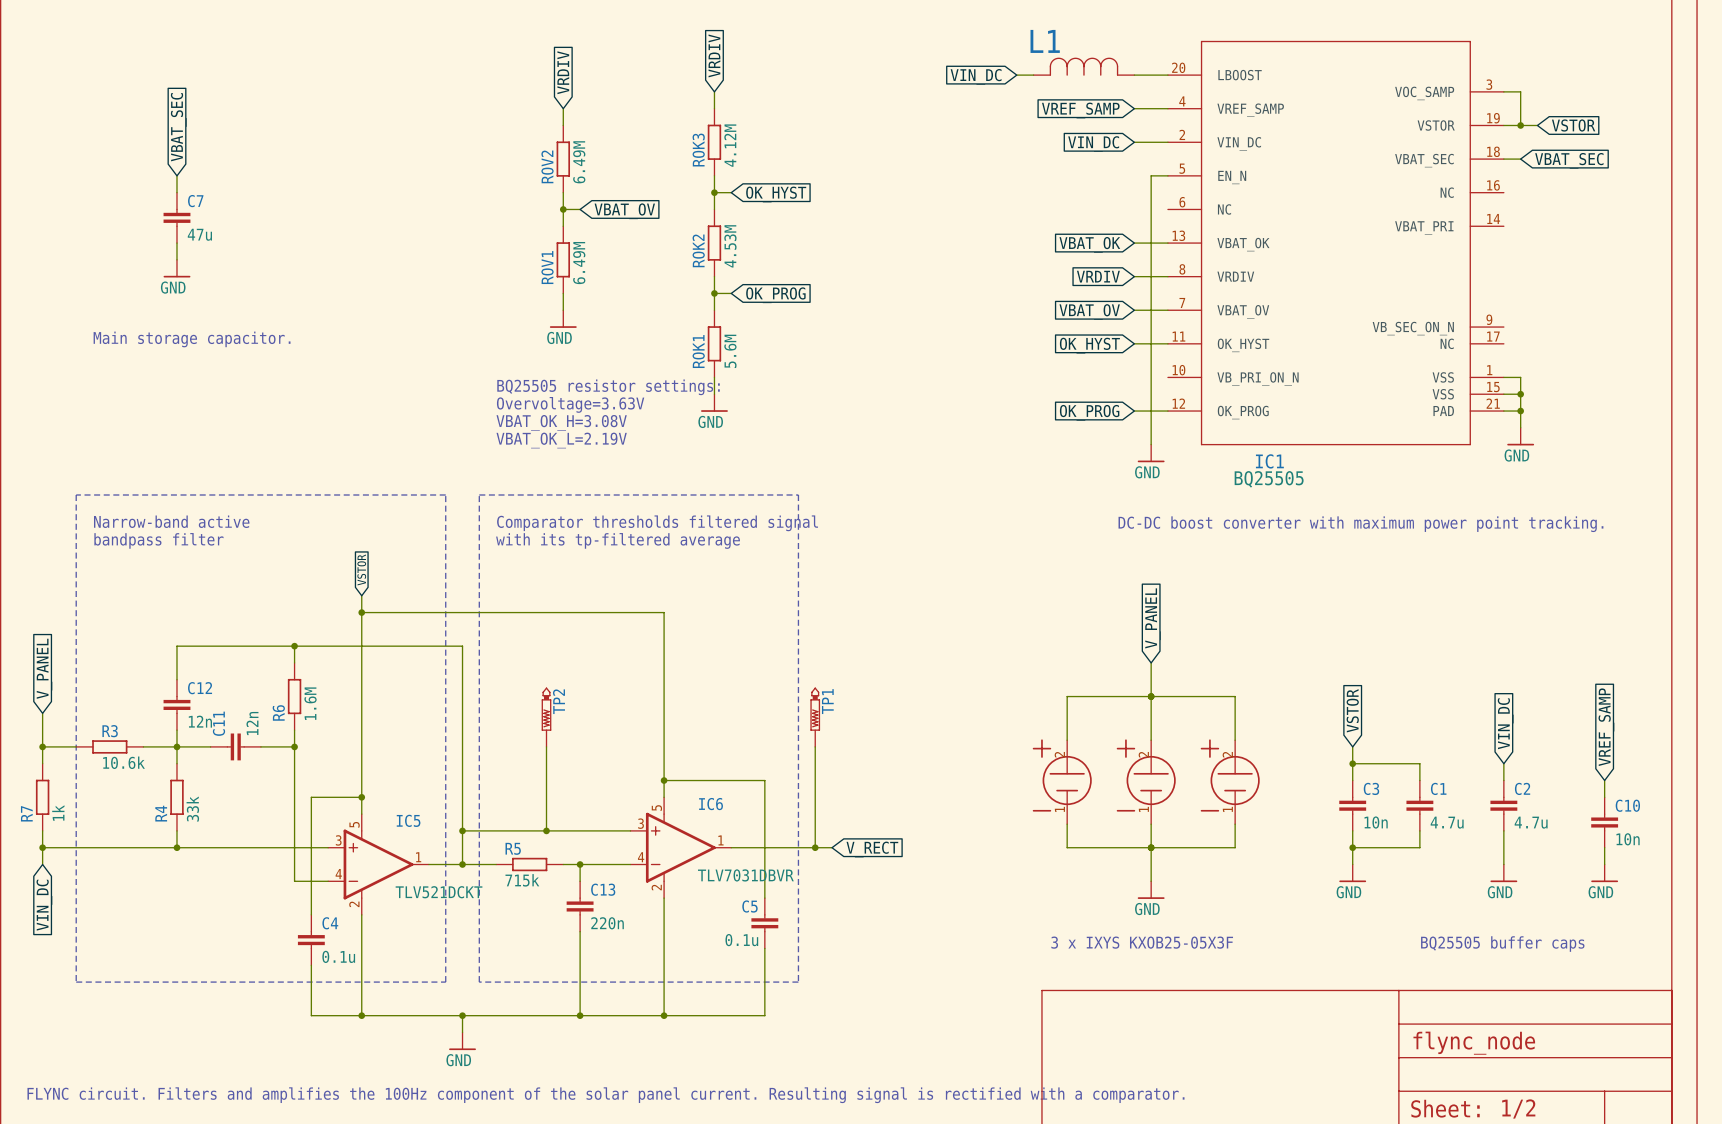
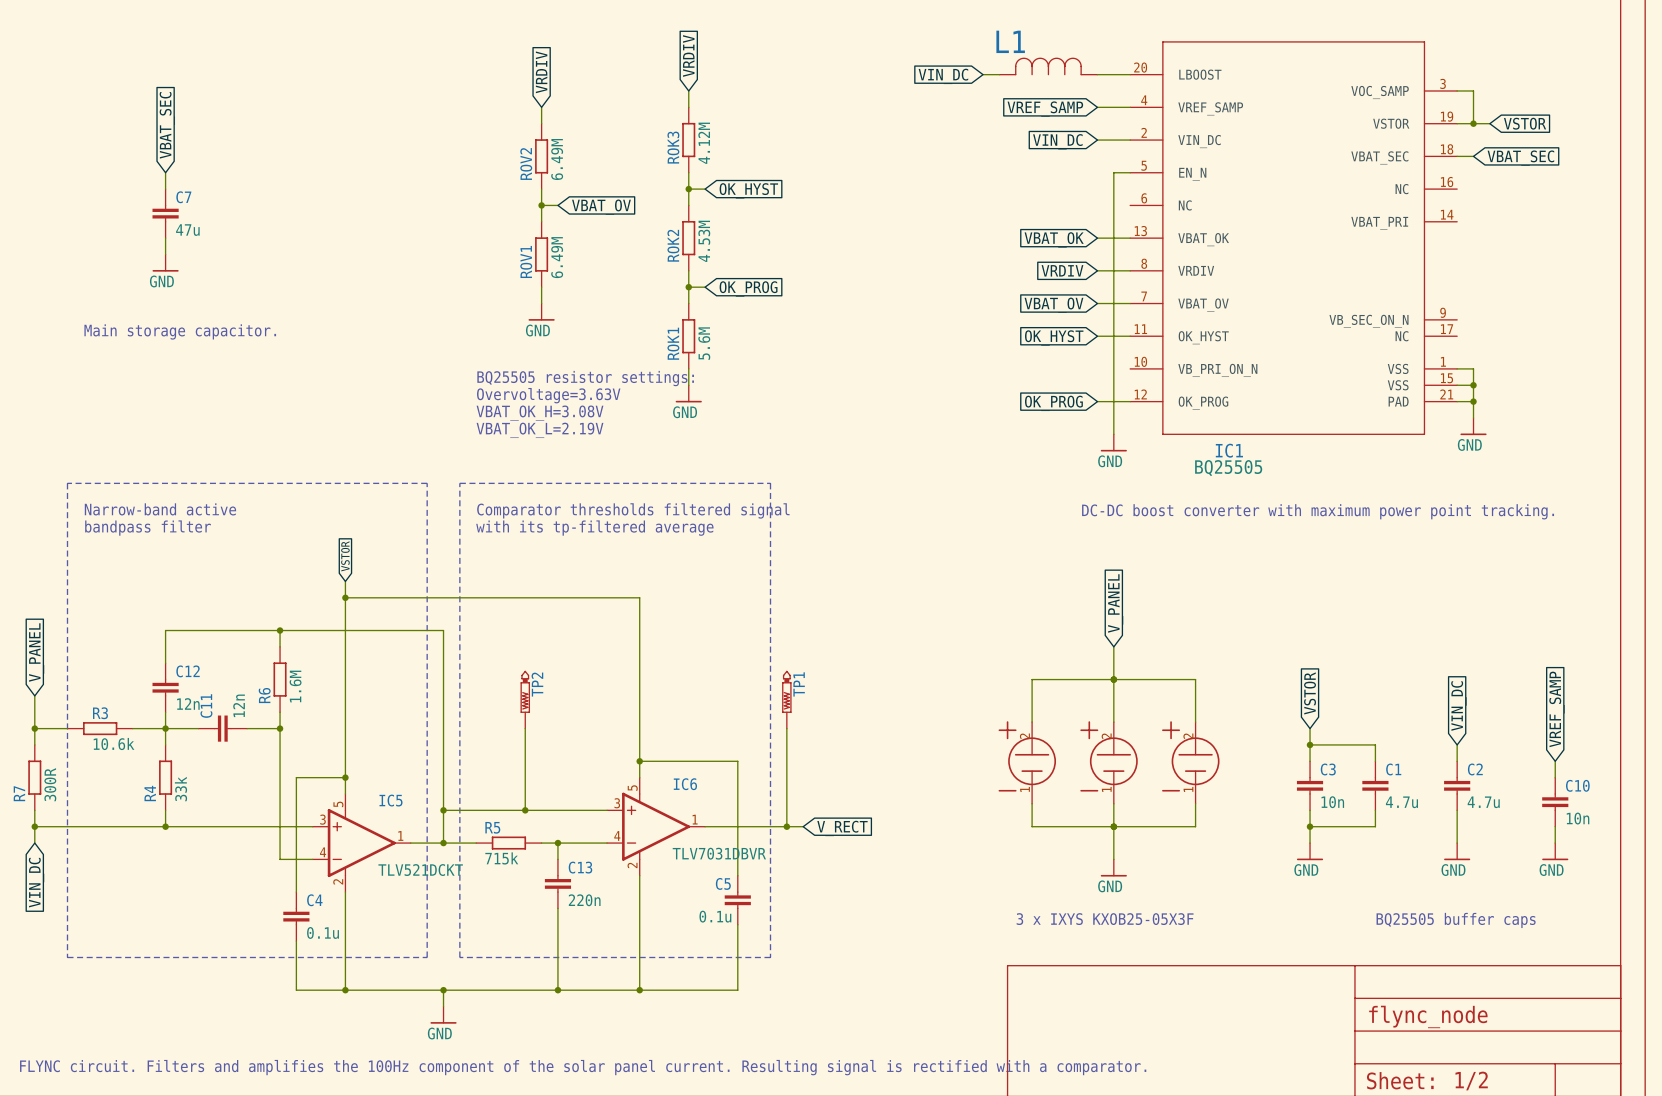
R7 value: 1k (58, 813) -> 300R (50, 784)

